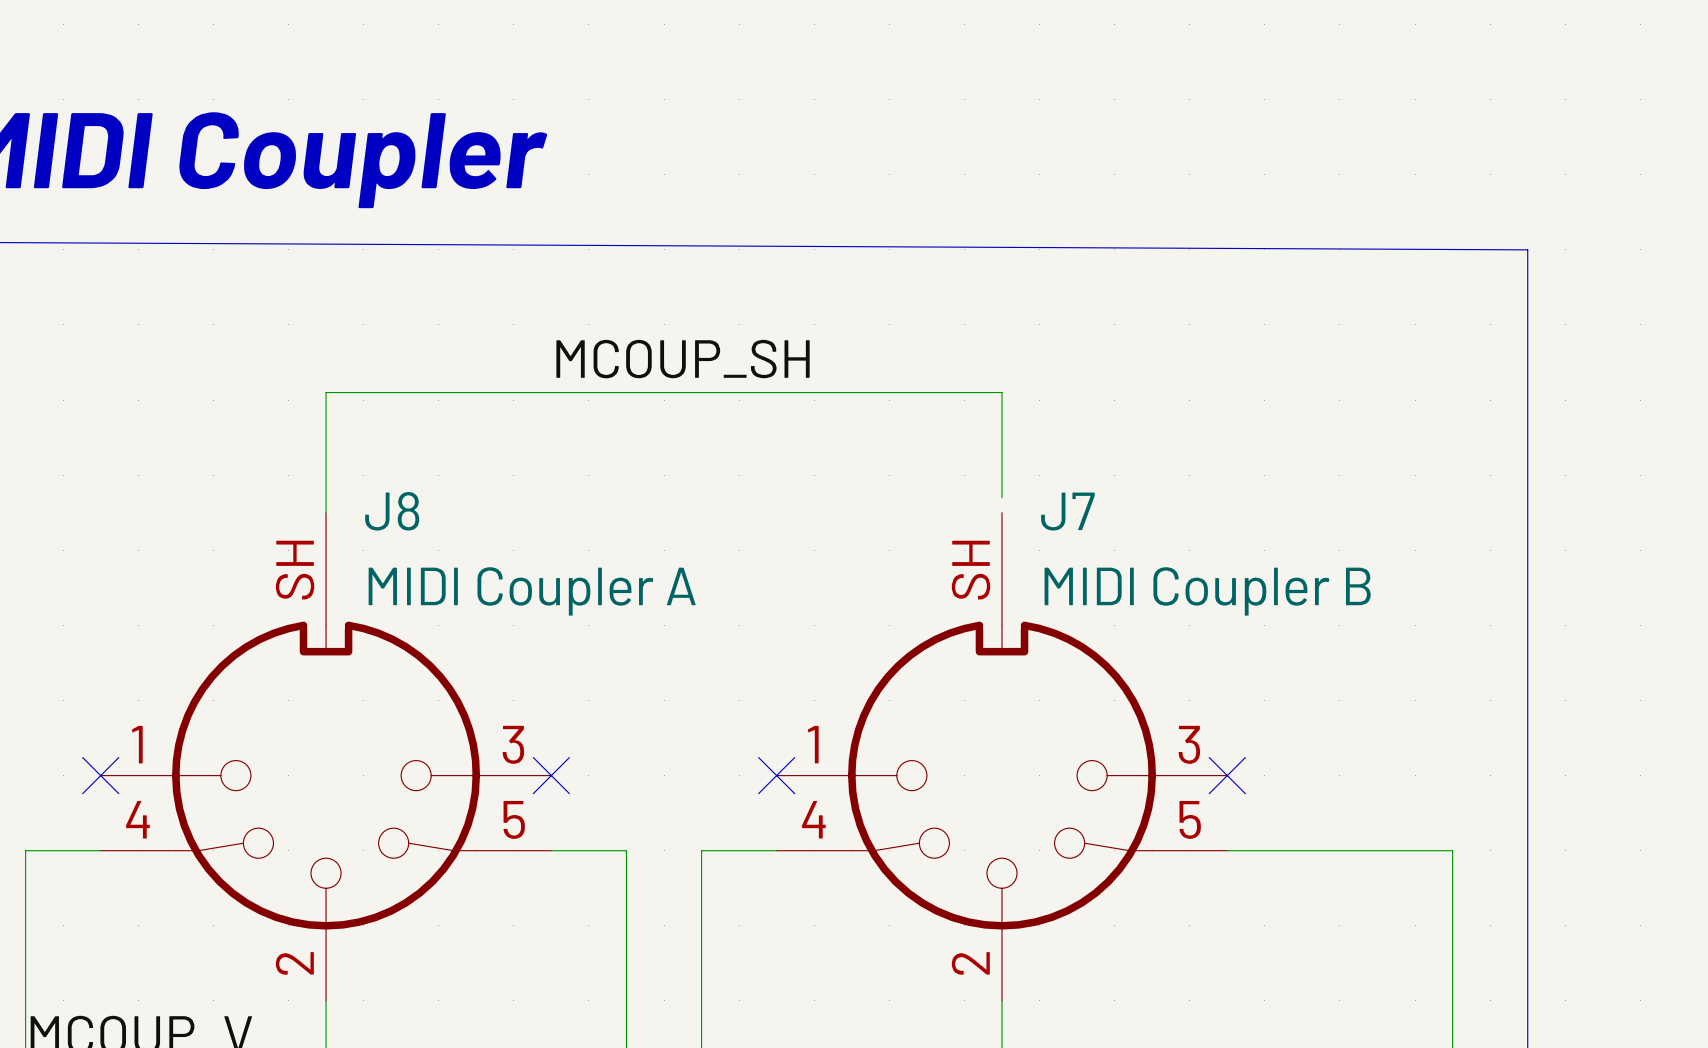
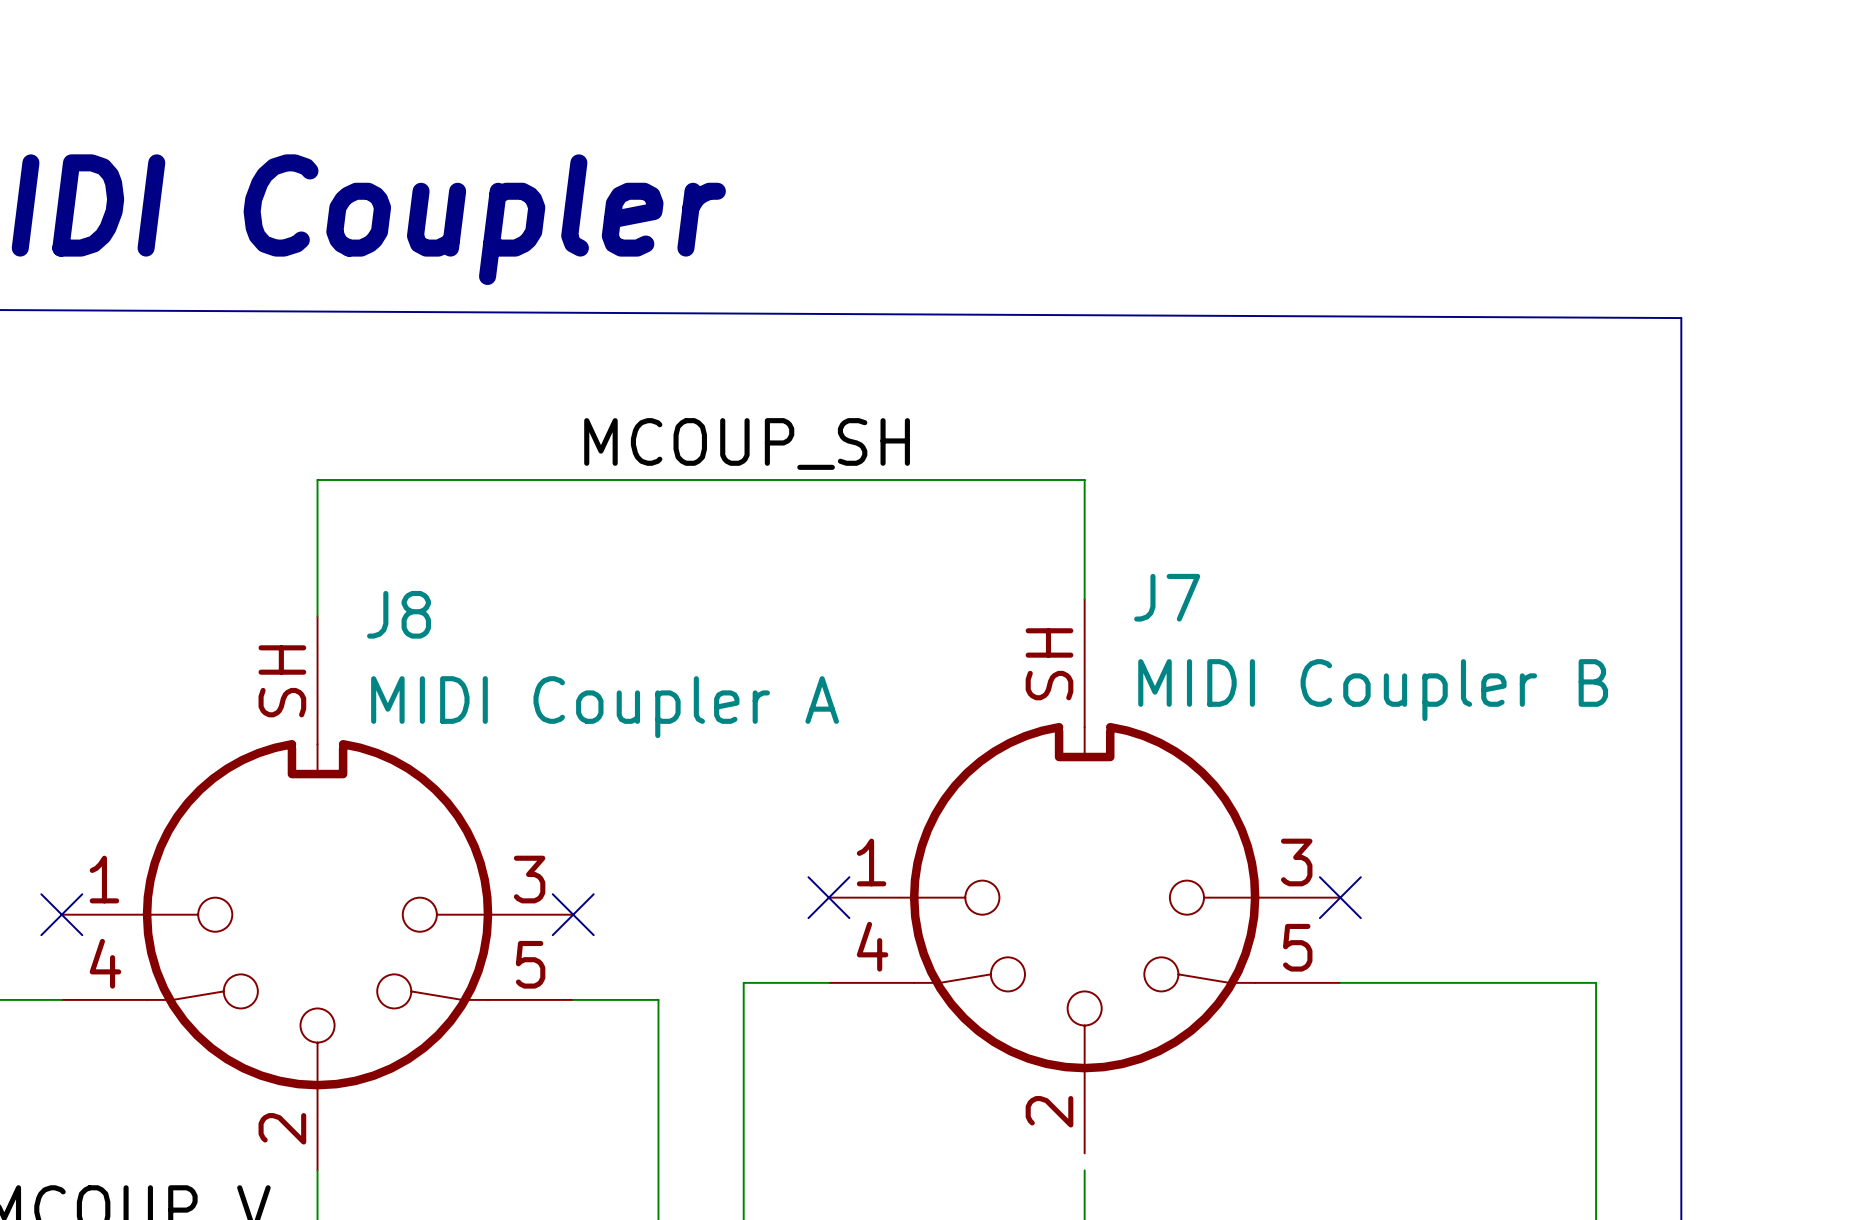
J7 position: (1001, 756) -> (1084, 876)
no-connect mark position: (776, 775) -> (828, 897)
no-connect mark position: (1227, 775) -> (1340, 897)
wire: (701, 850) (776, 850) -> (743, 999) (743, 982) (828, 982)
wire: (1227, 850) (1452, 850) -> (1340, 982) (1596, 982) (1596, 999)

